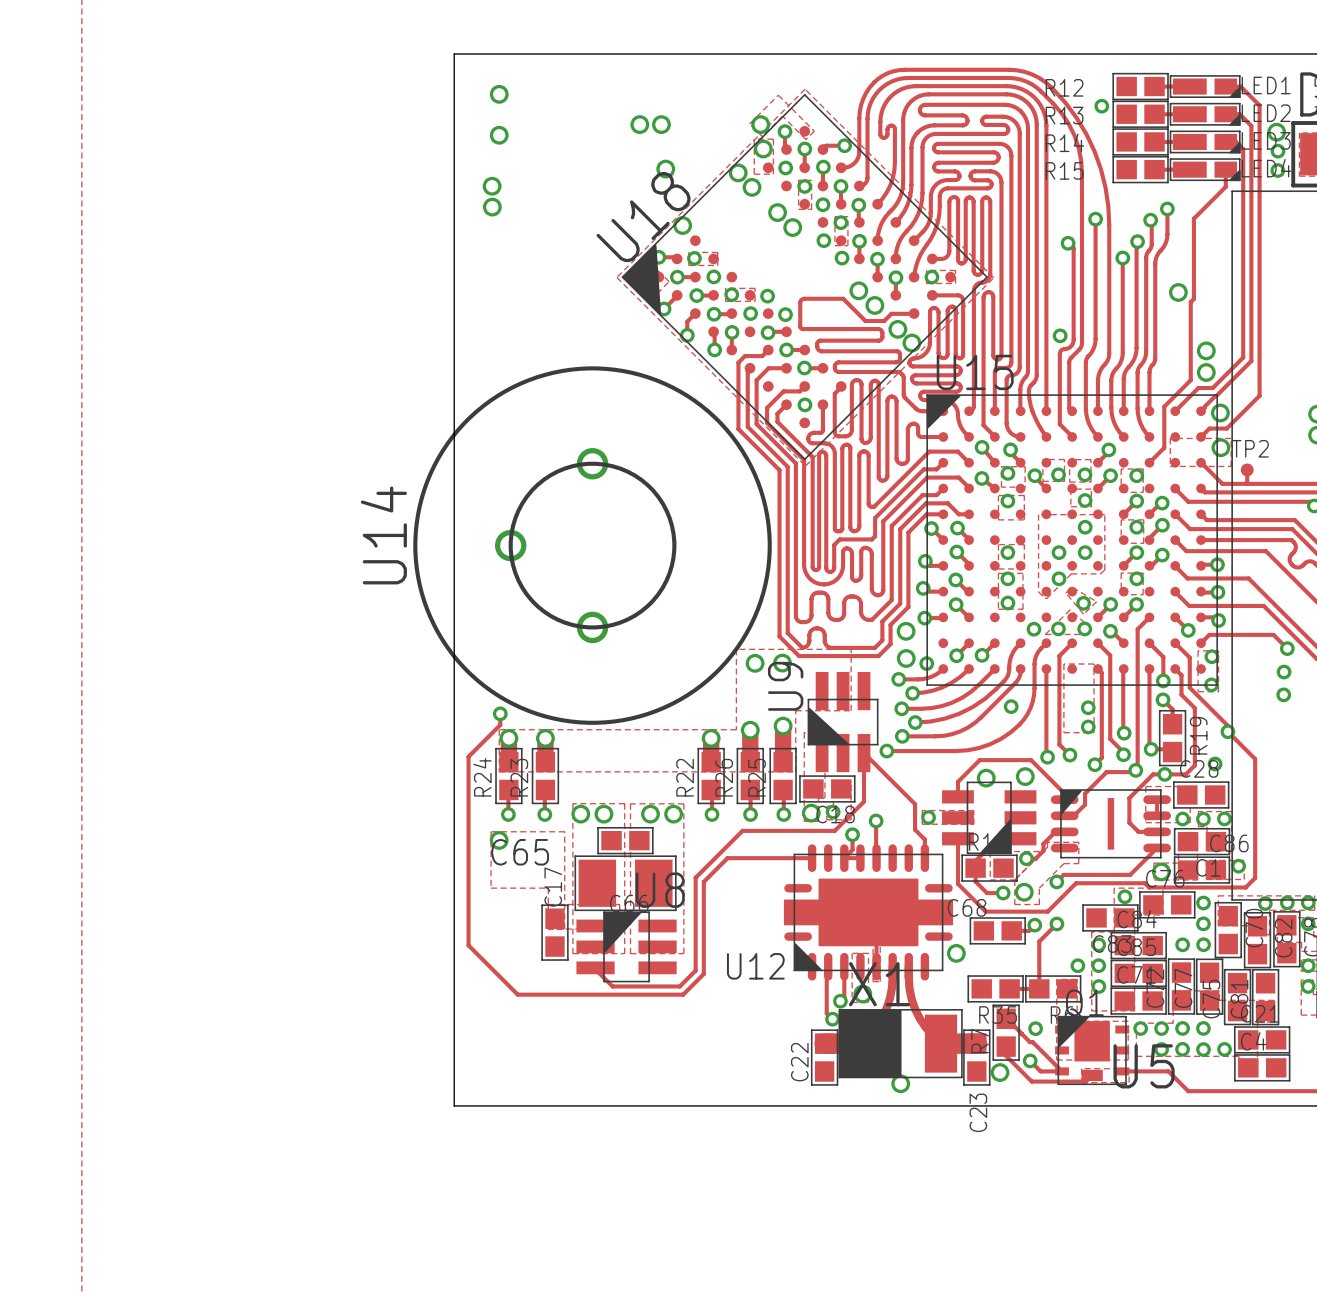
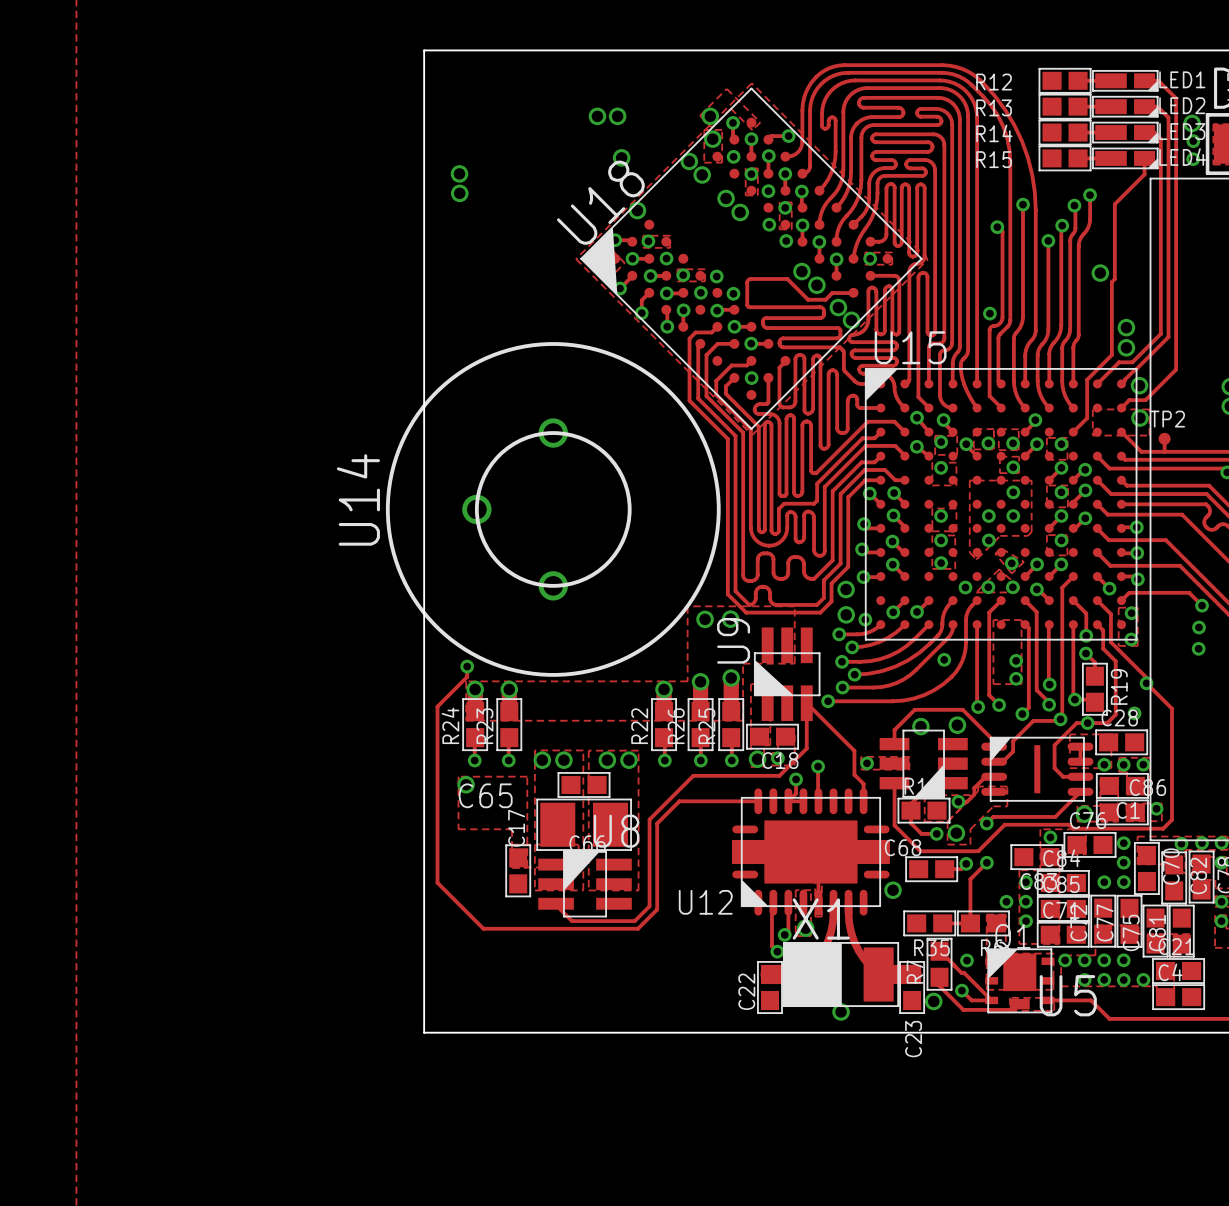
via: (499, 94) -> none
via: (1101, 106) -> none
via: (499, 135) -> none

